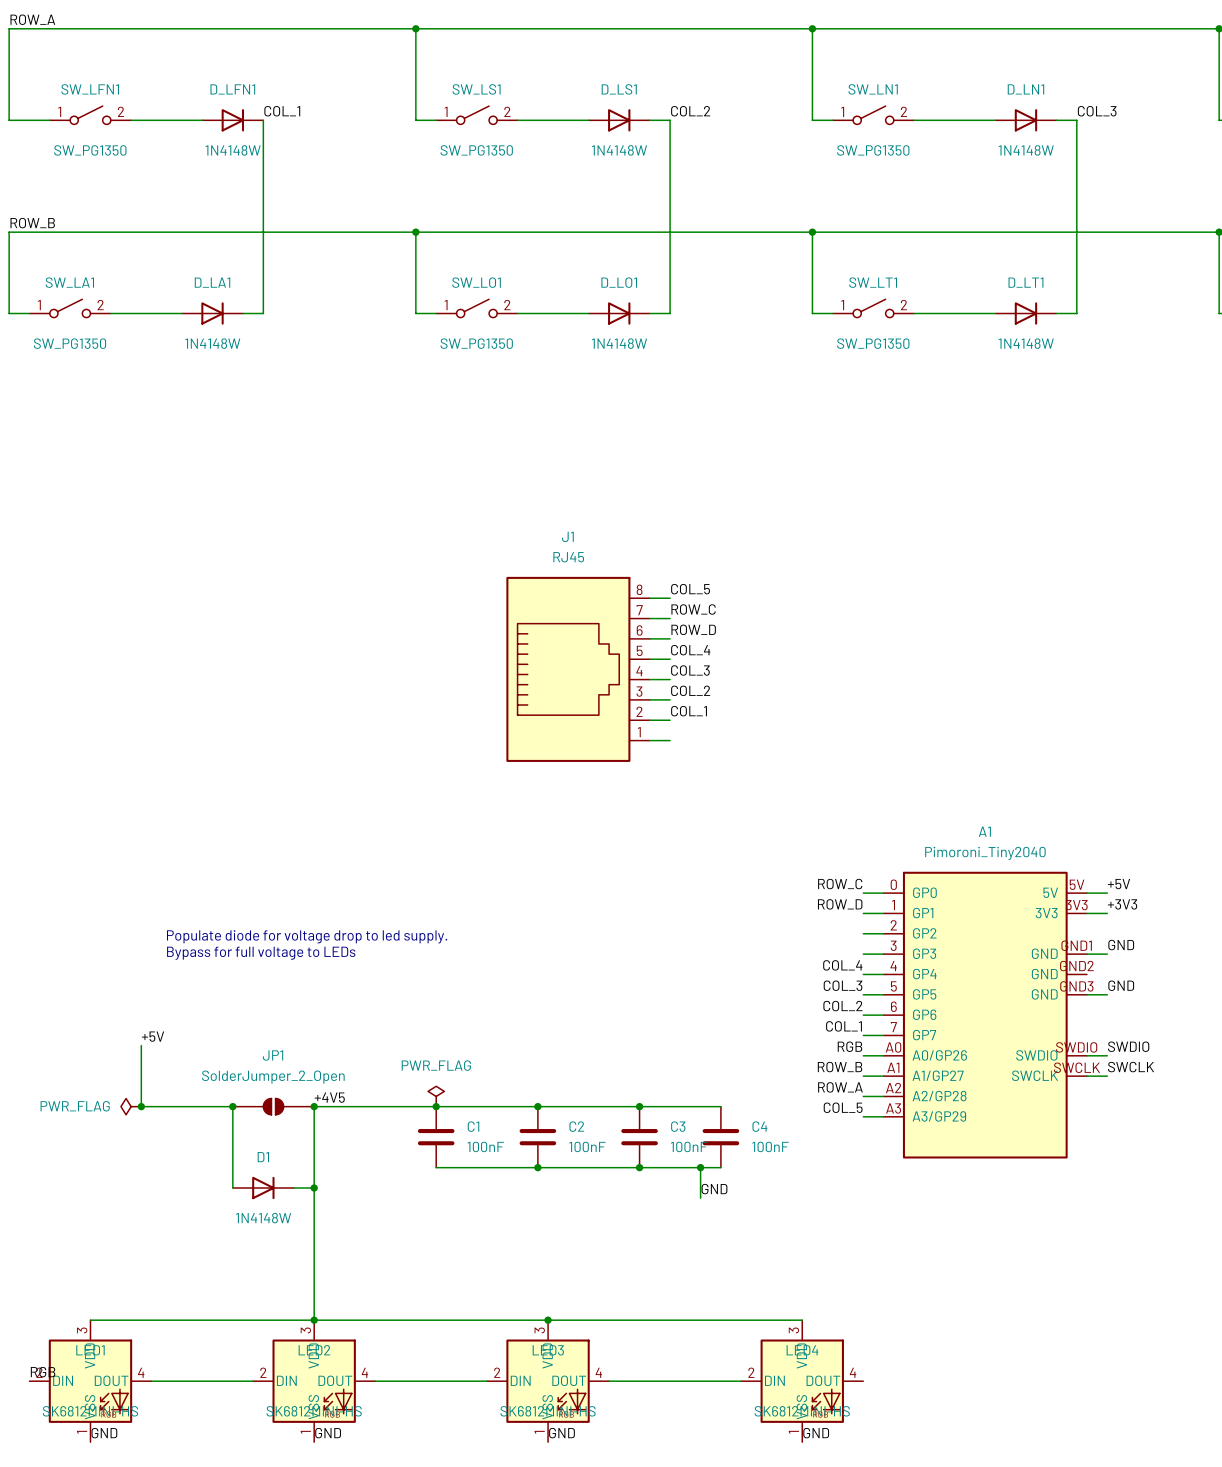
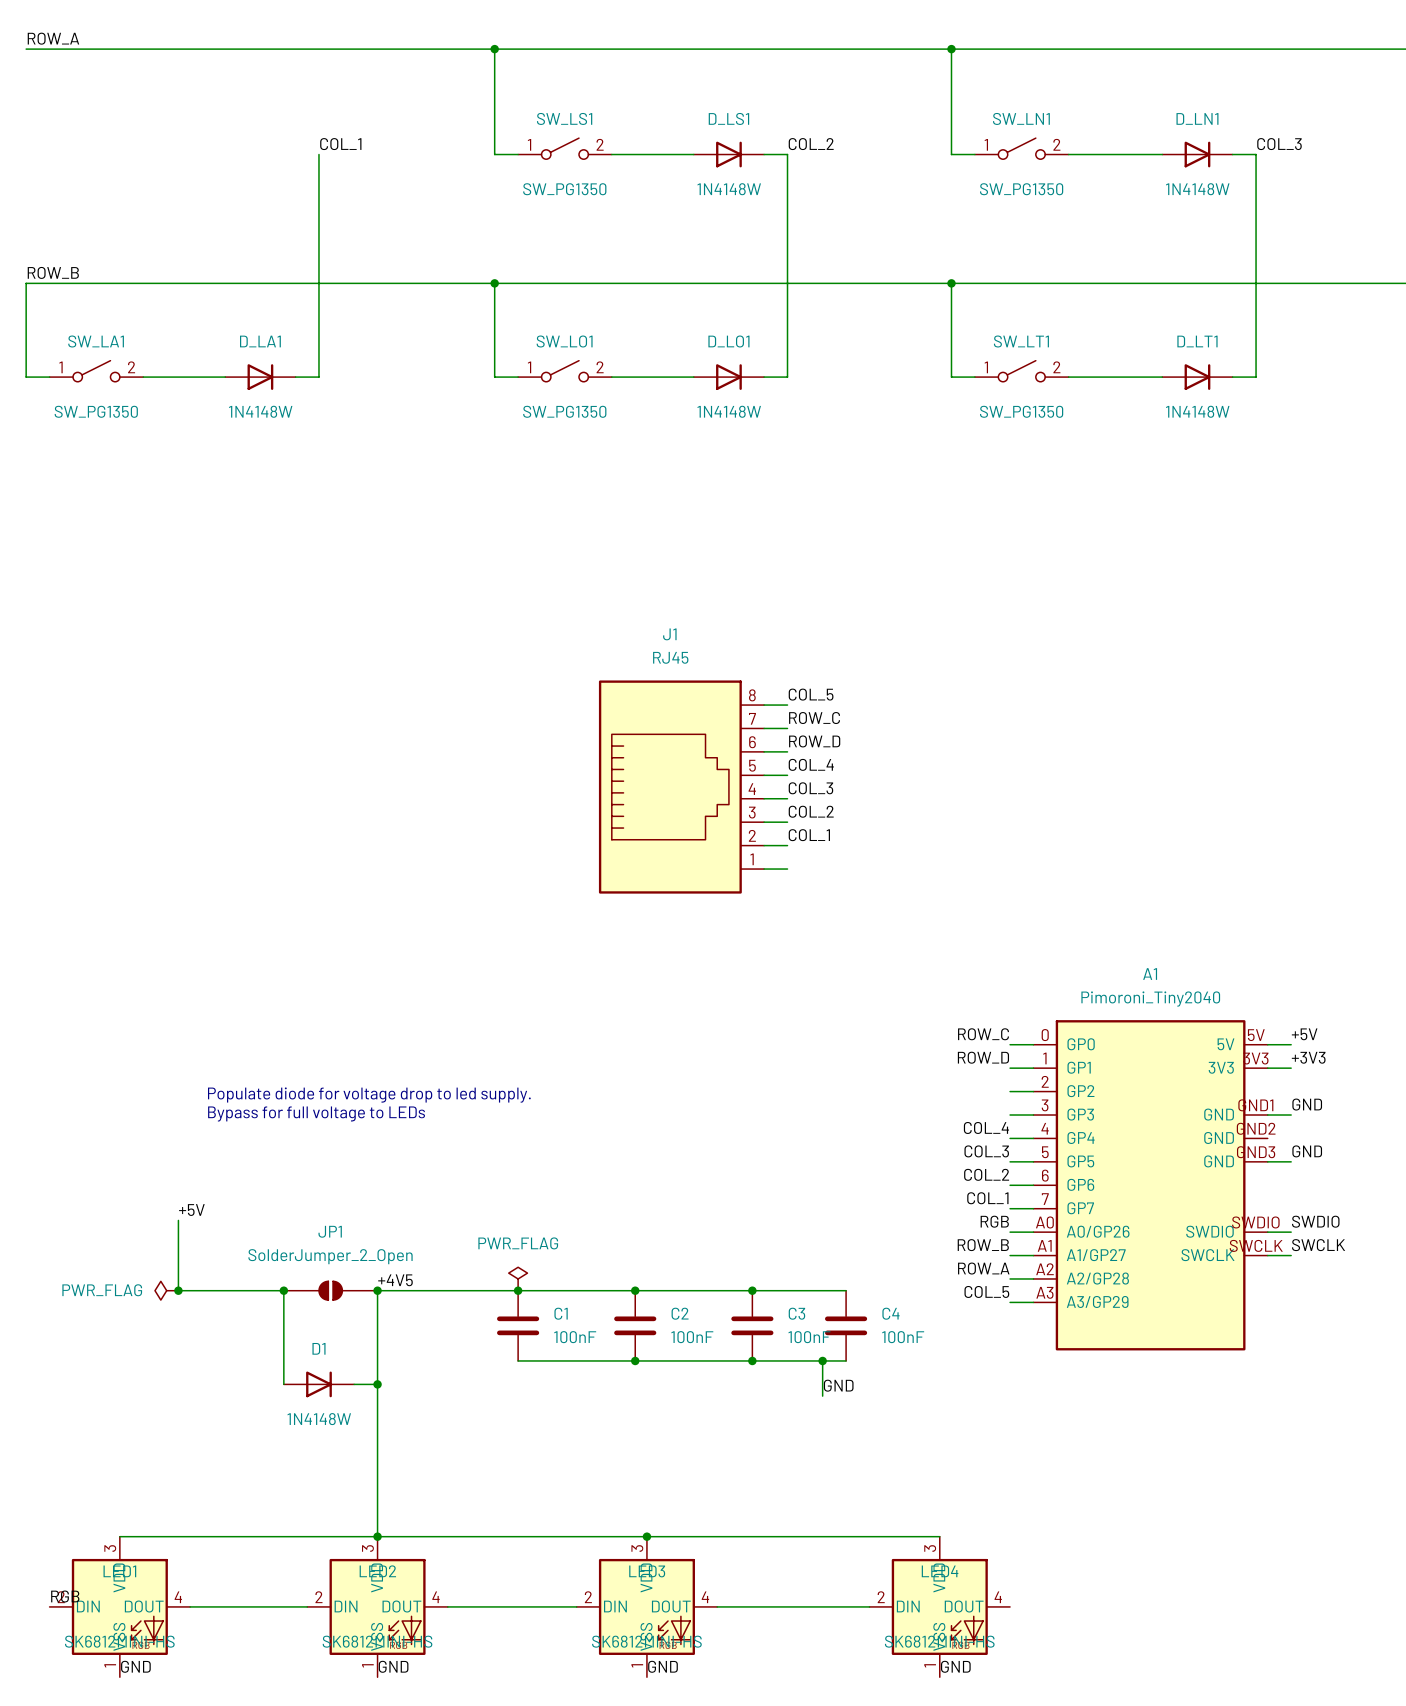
wire: (9, 28) (9, 120) (49, 120) -> none
SW_LFN1: SW_PG1350 (90, 115) -> none
wire: (131, 120) (202, 120) -> none
D_LFN1: 1N4148W (232, 120) -> none

